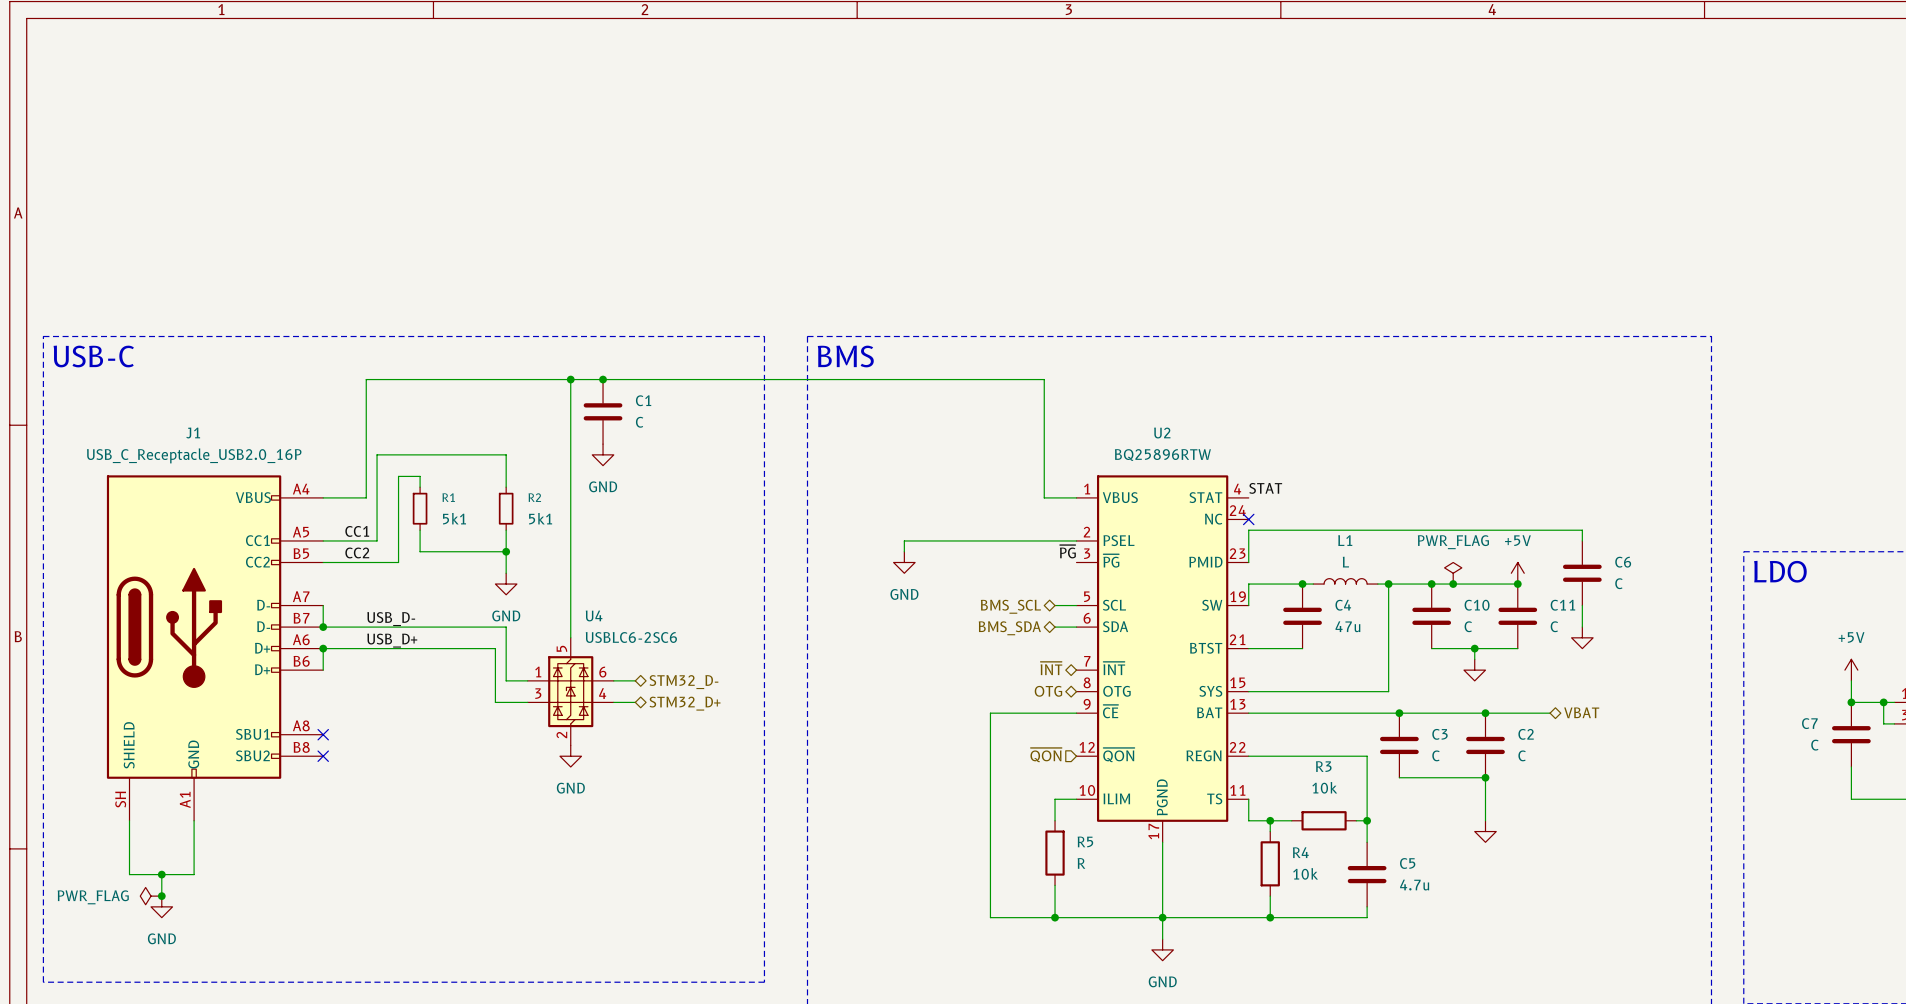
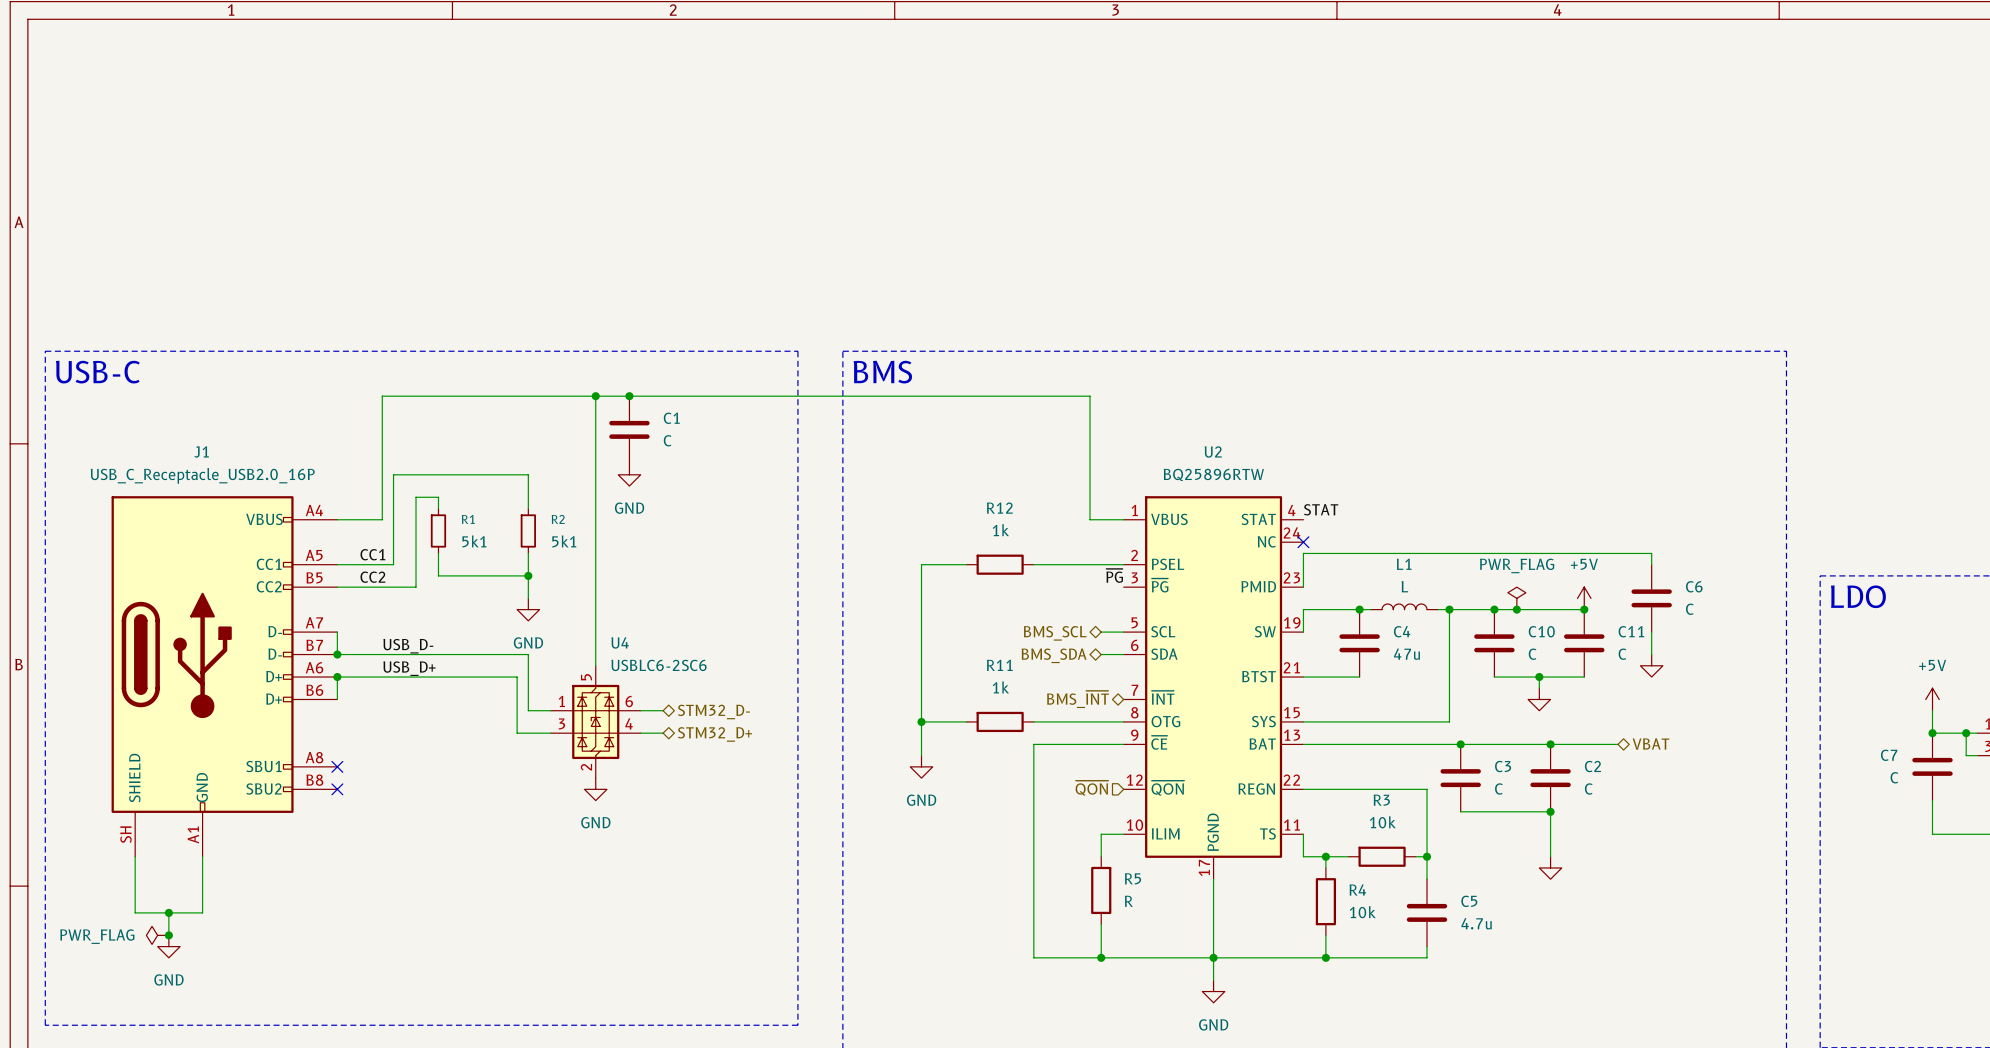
wire: (904, 540) (904, 551) -> (943, 564) (921, 564) (921, 755)
wire: (925, 540) (990, 540) -> none
R12: none -> 1k (1000, 564)
power symbol position: GND (904, 562) -> GND (921, 766)
hierarchical label: ~{INT} (1051, 668) -> BMS_~{INT} (1077, 699)
wire: none -> (921, 721) (966, 721)
junction: none -> (921, 721)
R11: none -> 1k (1000, 721)
wire: none -> (1033, 721) (1123, 721)
hierarchical label: OTG (1048, 691) -> none

